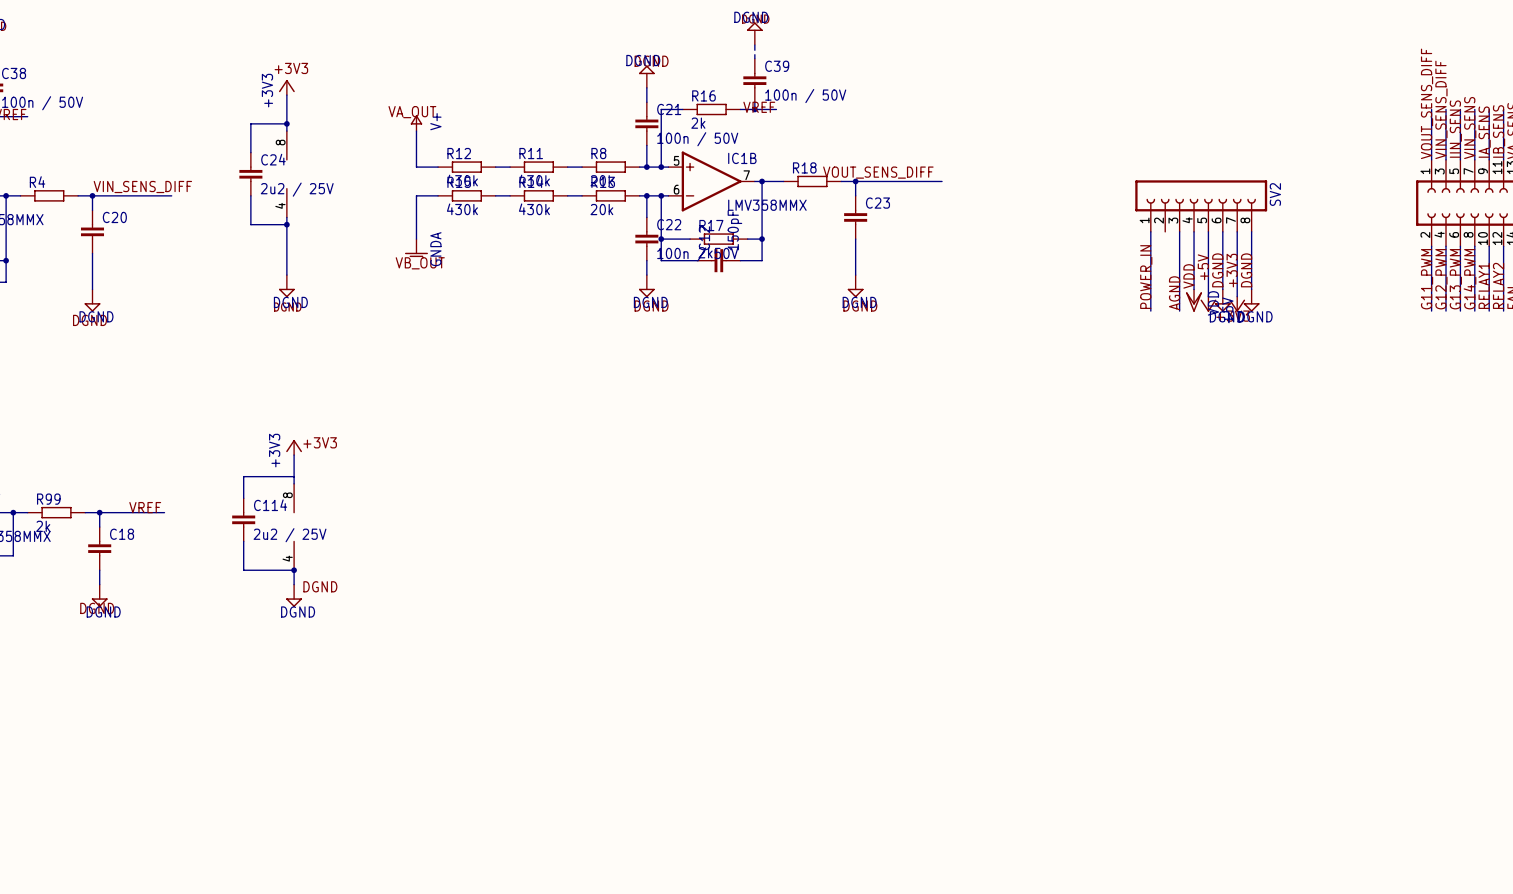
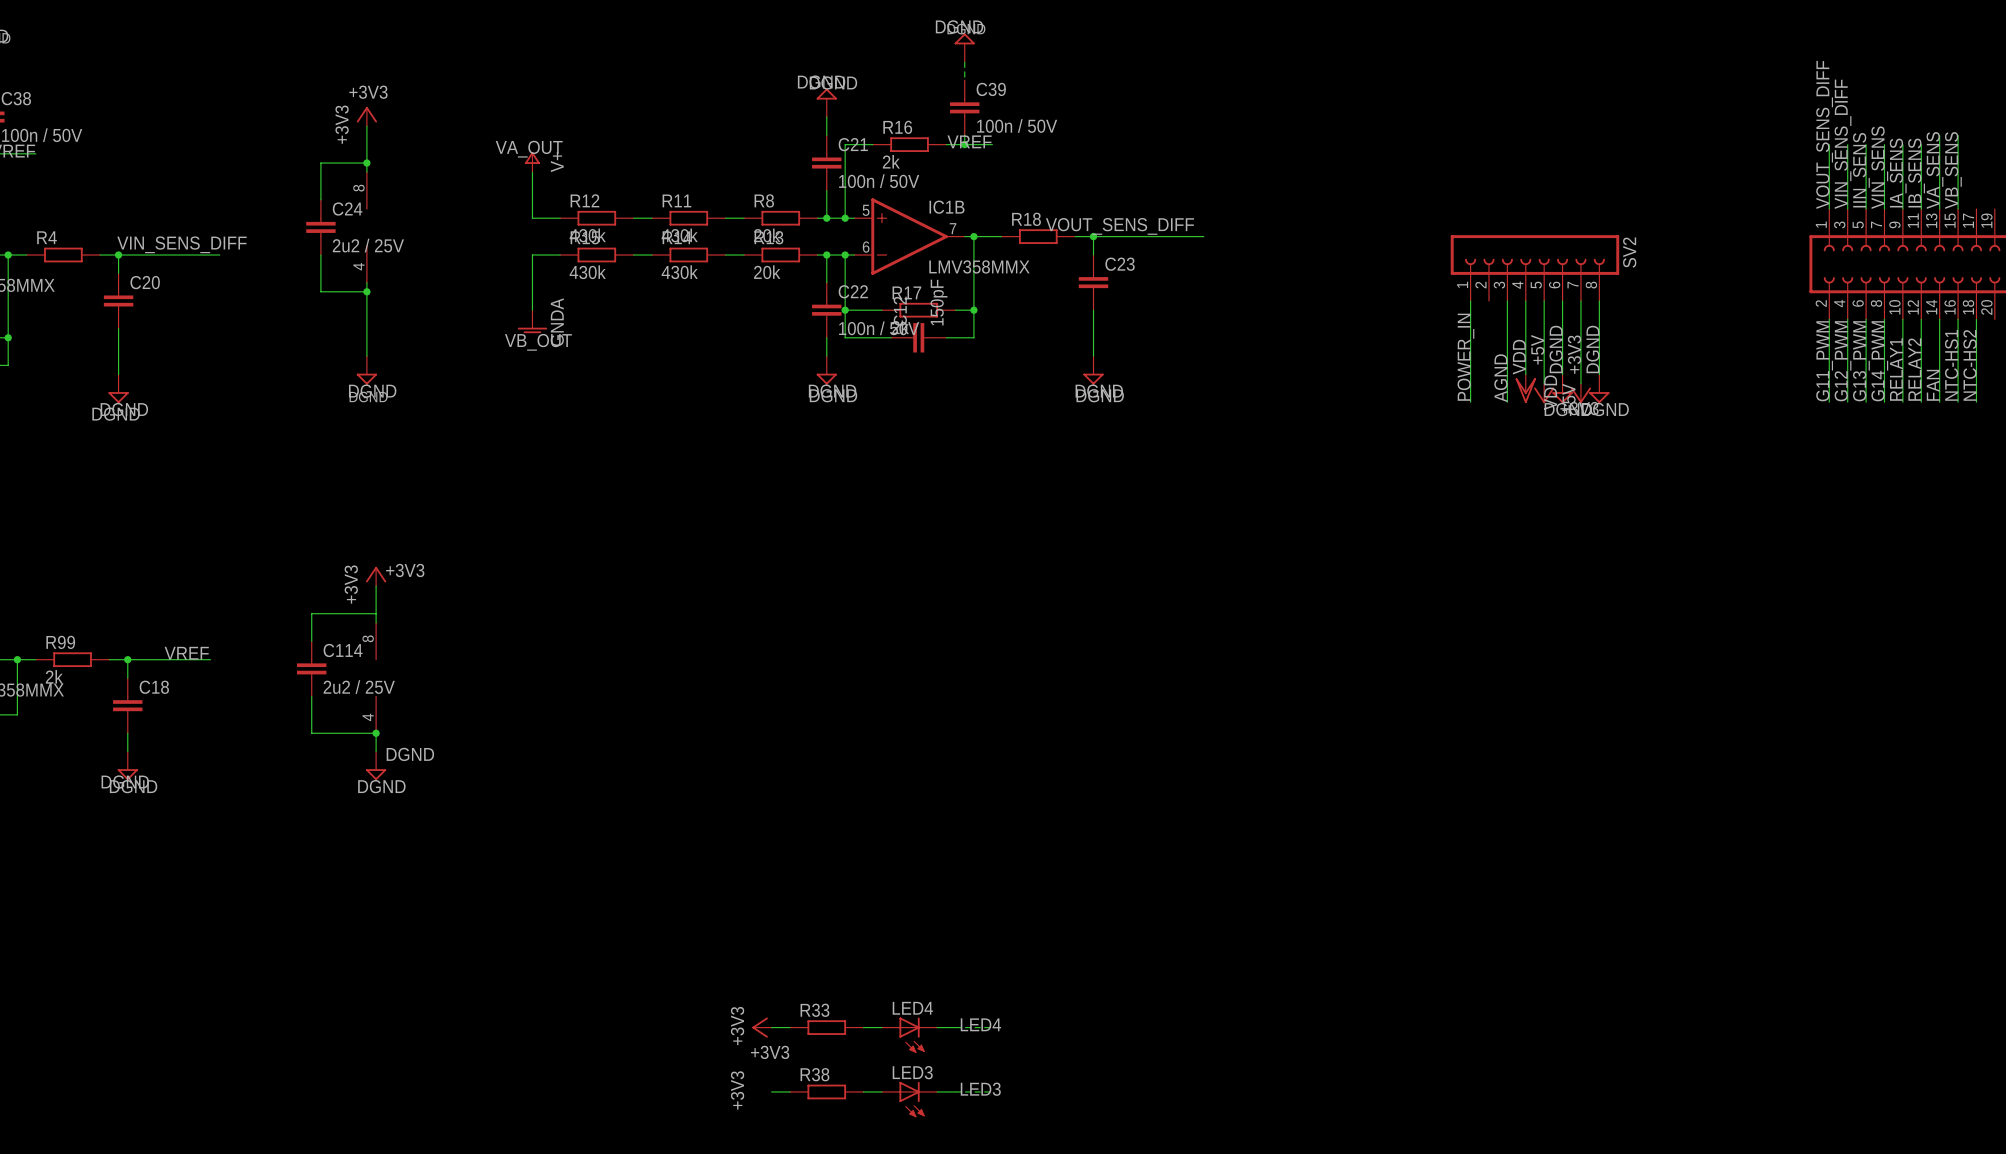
label: none -> +3V3 (737, 1026)
label: none -> LED4 (980, 1024)
power symbol: none -> +3V3 (761, 1027)
wire: none -> (771, 1027) (789, 1027)
R33: none -> (826, 1027)
wire: none -> (863, 1027) (881, 1027)
wire: none -> (937, 1027) (992, 1027)
LED4: none -> (909, 1035)
label: none -> +3V3 (737, 1090)
label: none -> LED3 (980, 1089)
wire: none -> (771, 1091) (789, 1091)
R38: none -> (826, 1091)
wire: none -> (863, 1091) (881, 1091)
wire: none -> (937, 1091) (992, 1091)
LED3: none -> (909, 1099)

